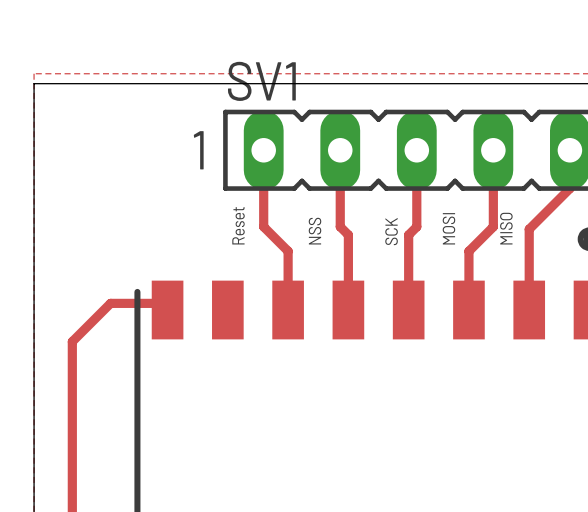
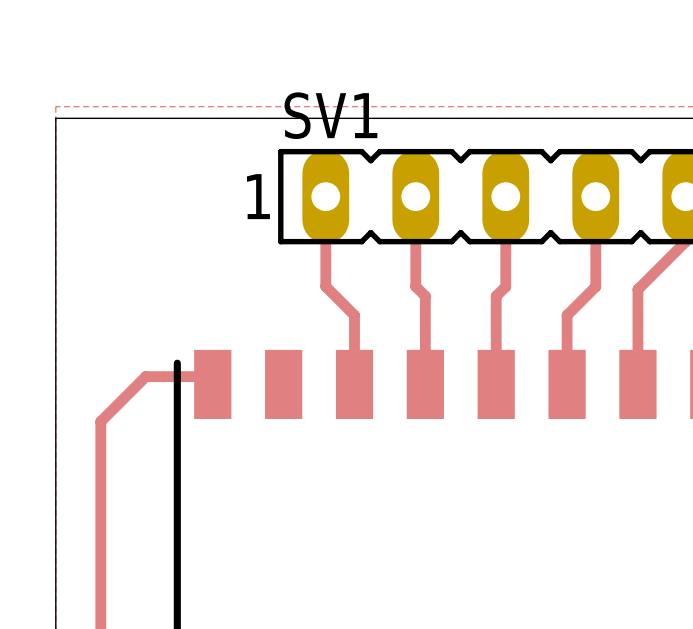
text: Reset (238, 225) -> none
text: MOSI (448, 228) -> none
text: MISO (506, 228) -> none
text: NSS (314, 231) -> none
text: SCK (391, 231) -> none

